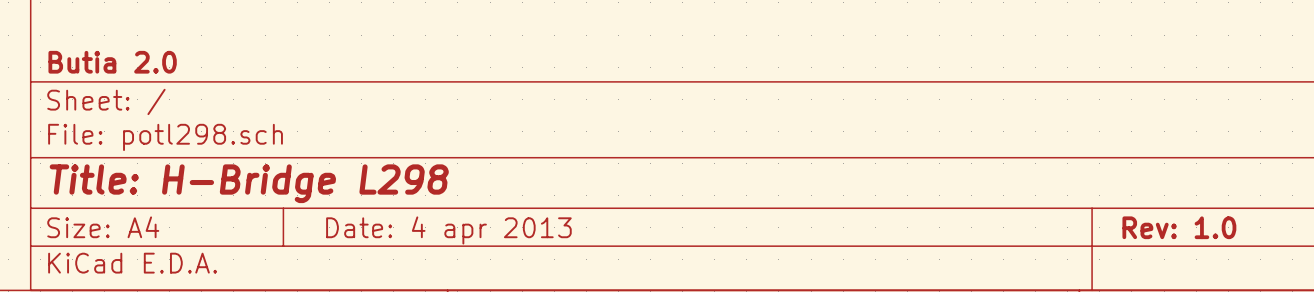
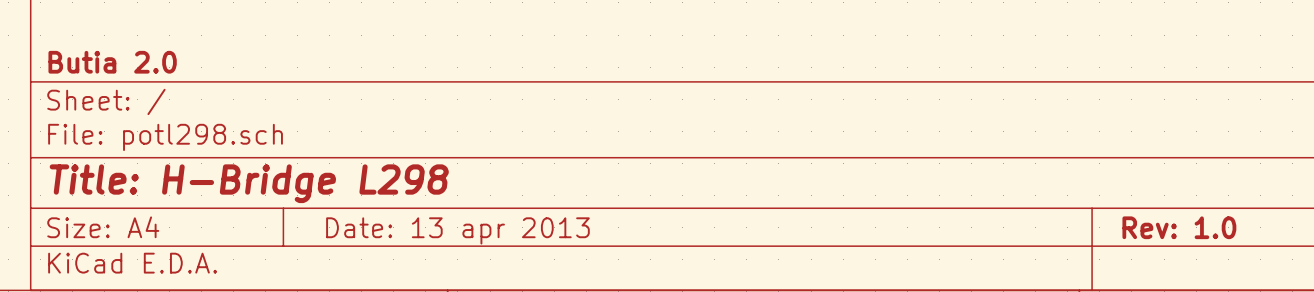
title block: Date: 4 apr 2013 (448, 230) -> Date: 13 apr 2013 (457, 230)

